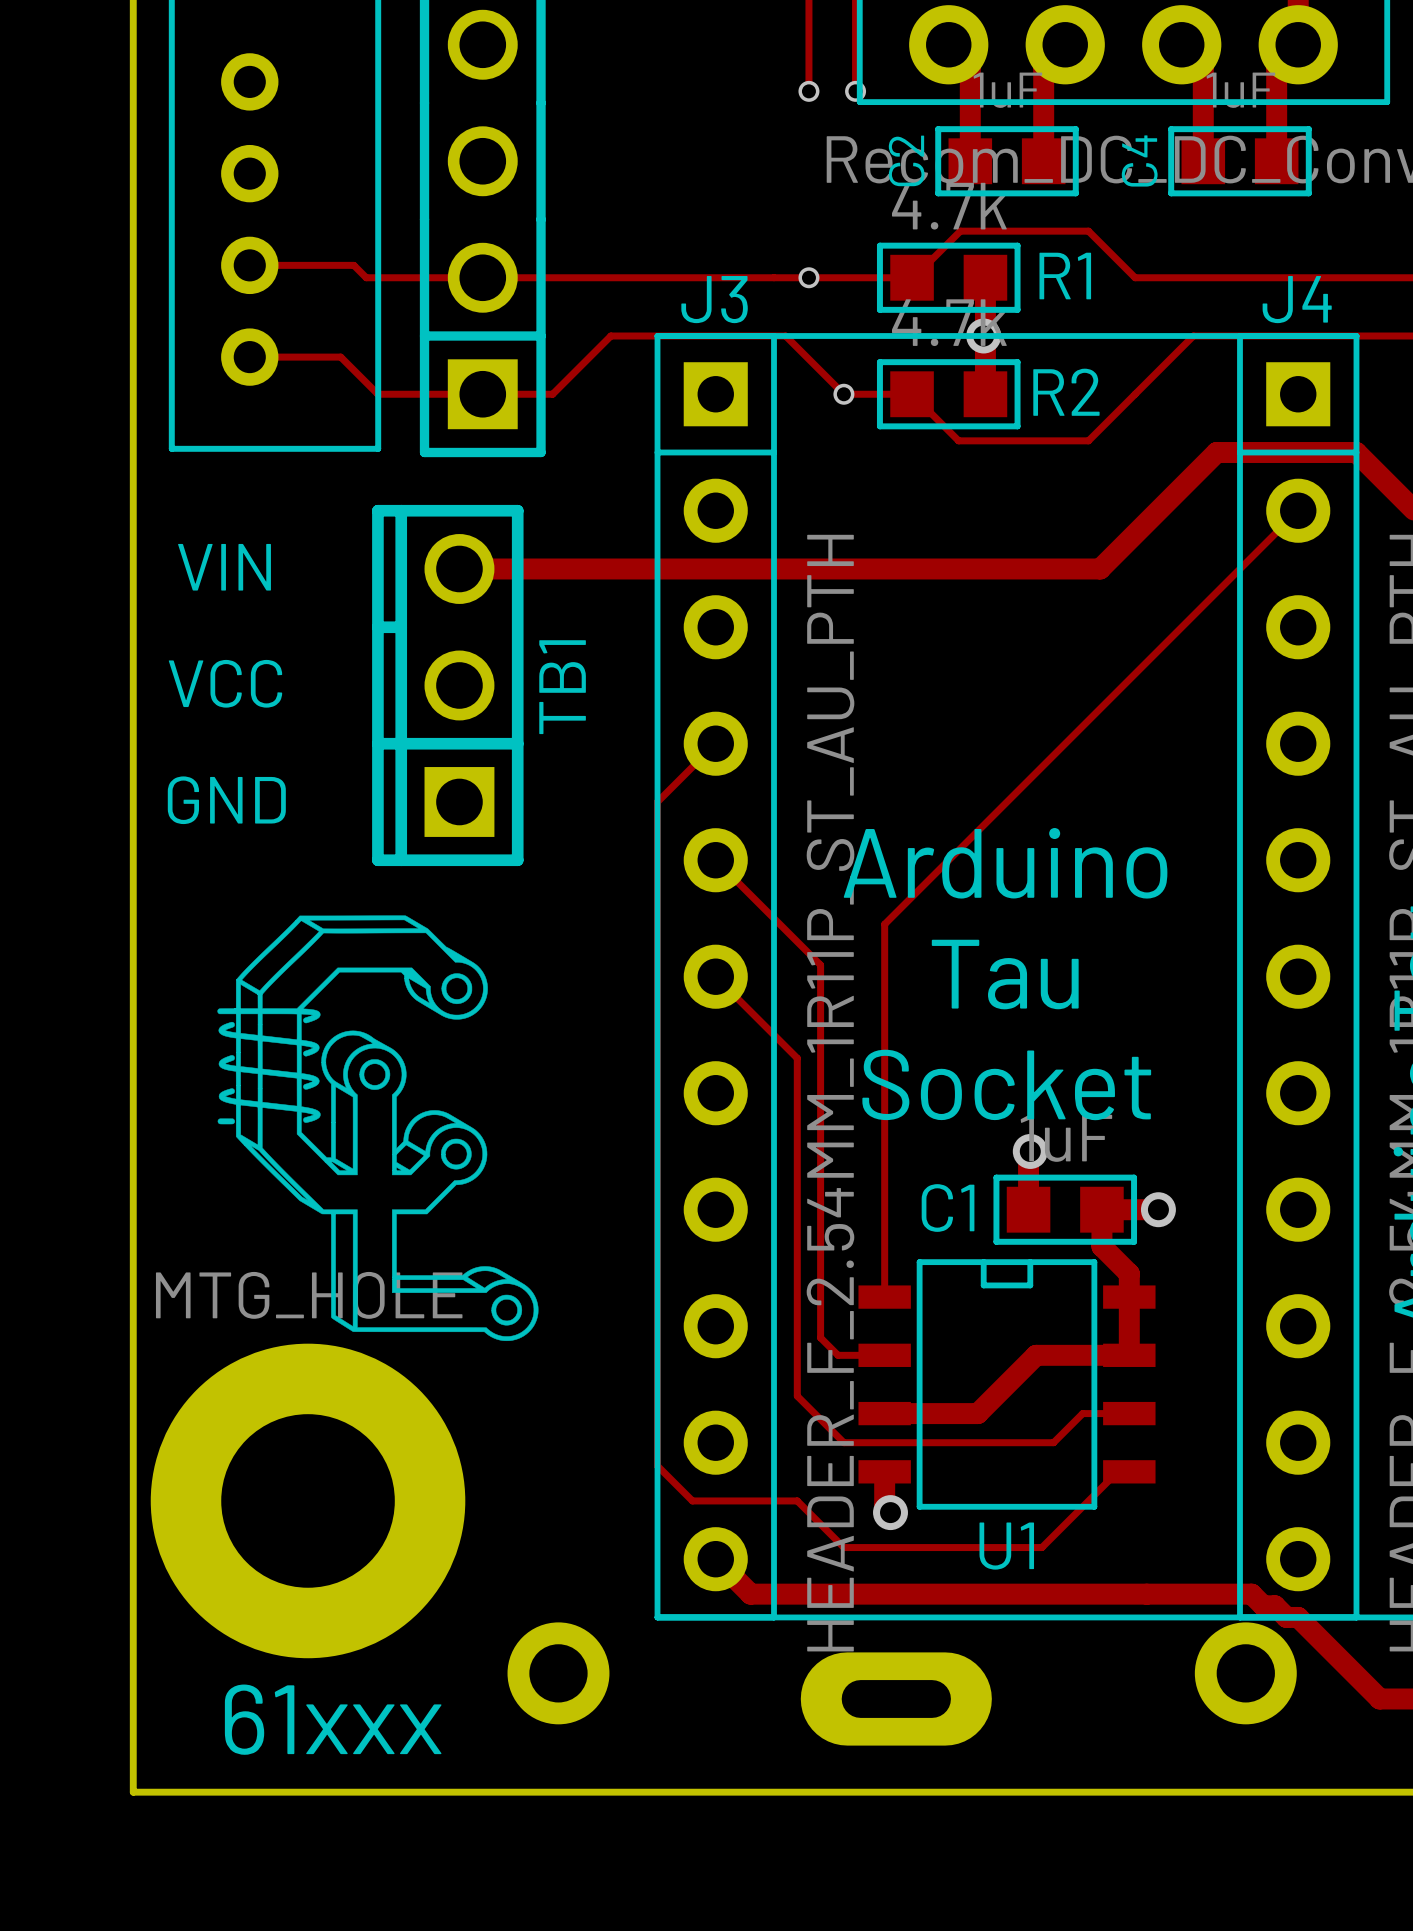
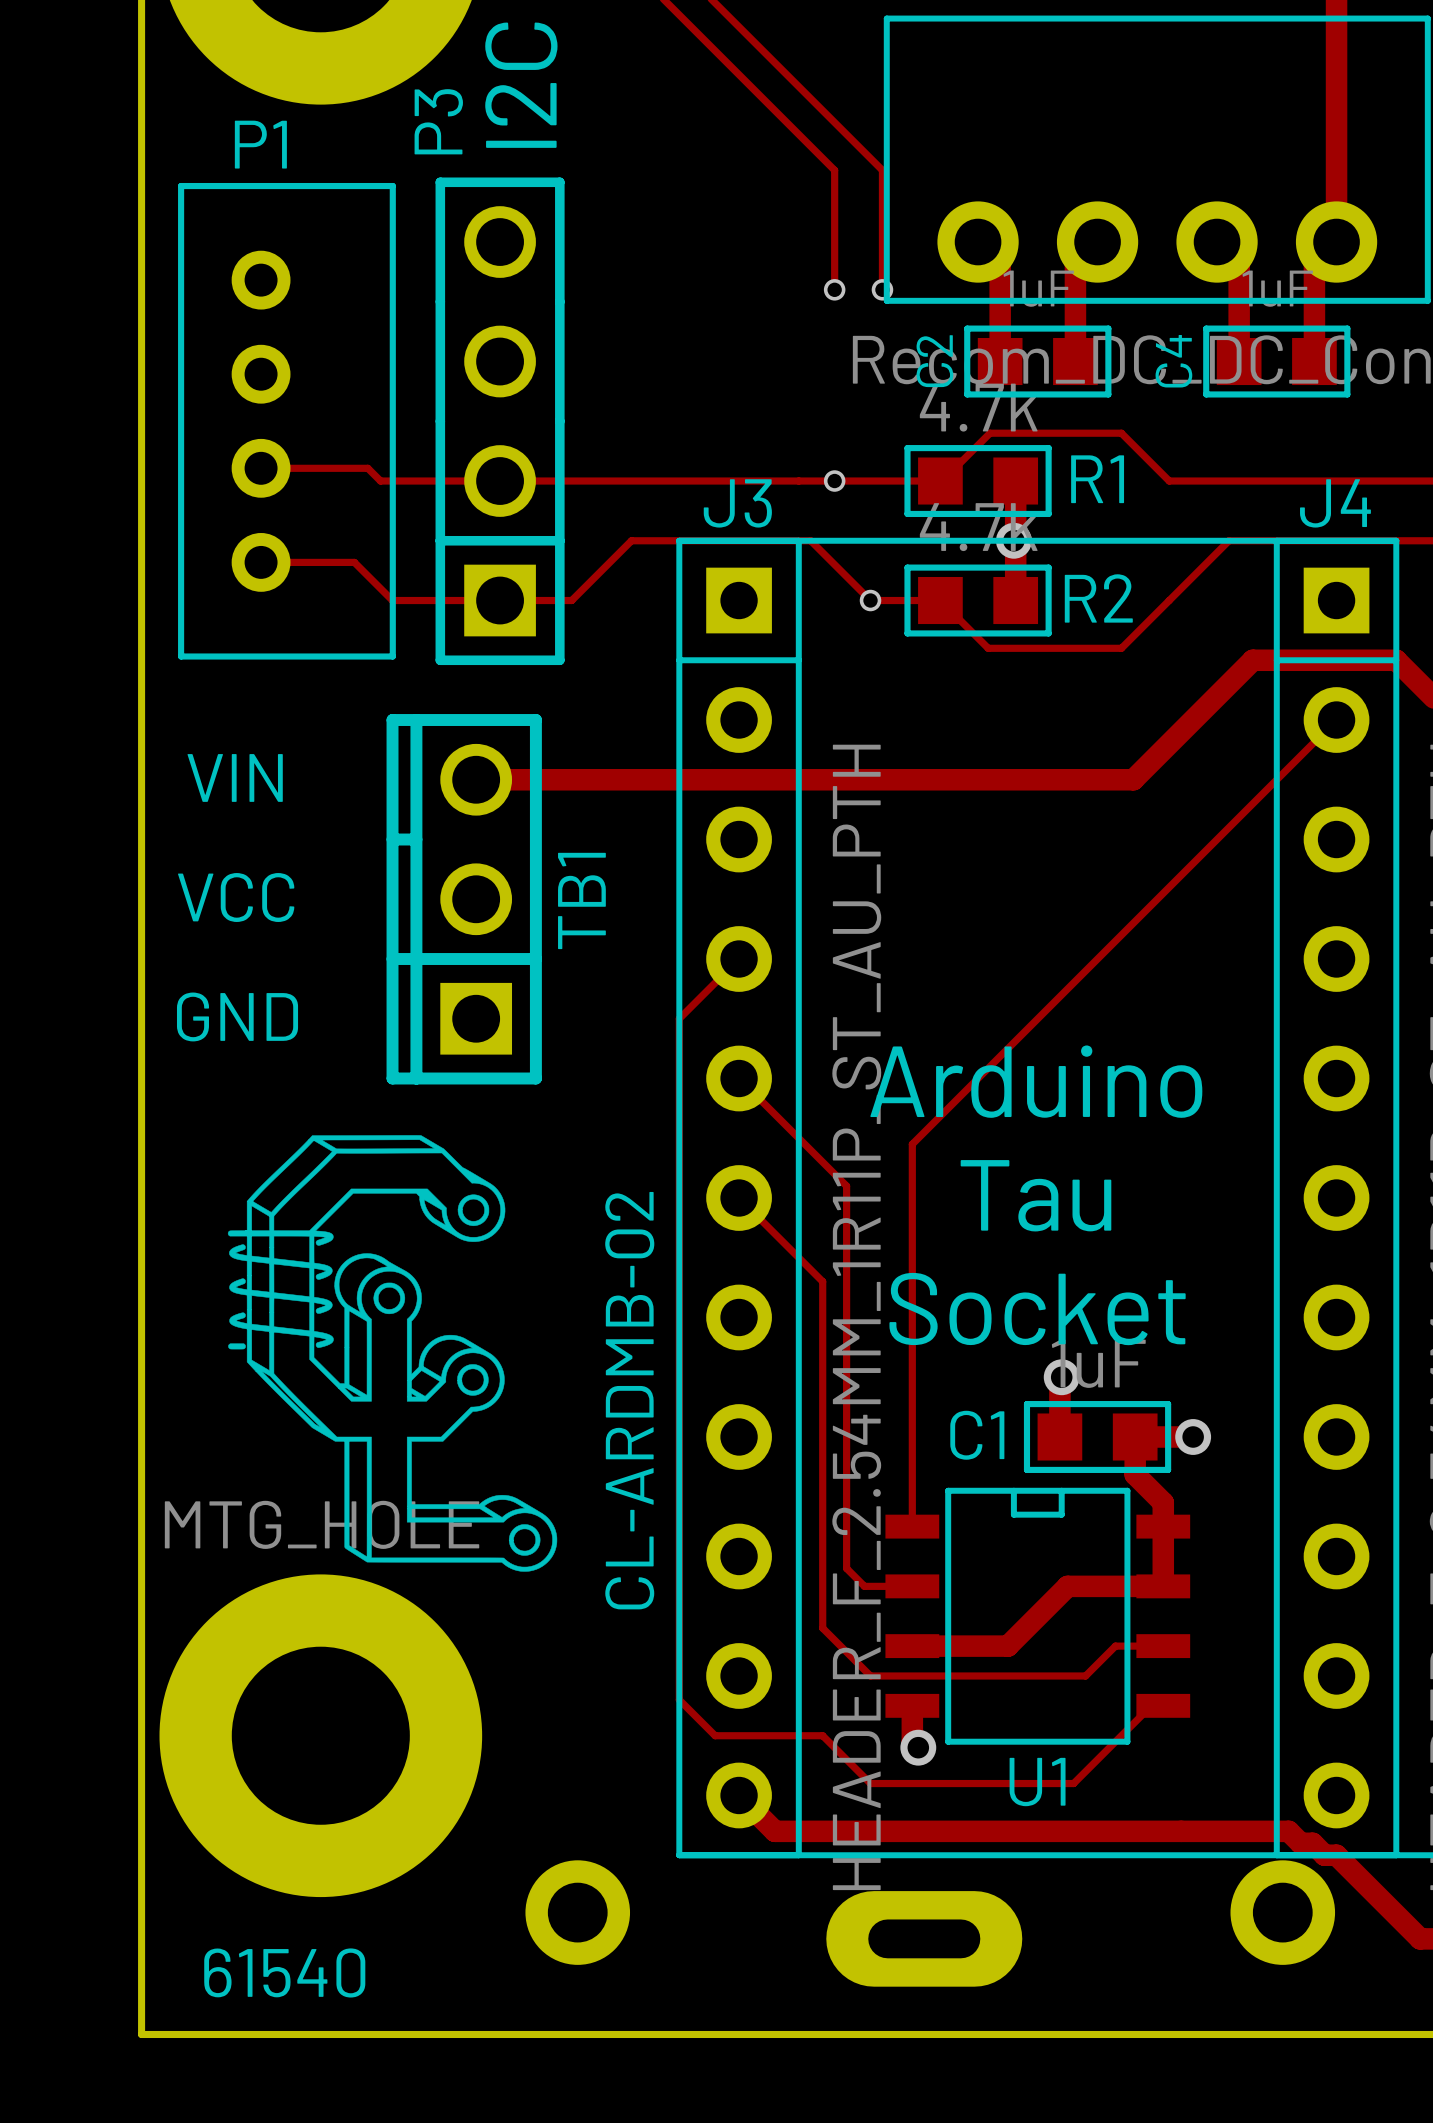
text: none -> CL-ARDMB-02 (629, 1400)
text: 61xxx (333, 1719) -> none
text: none -> 61540 (284, 1972)

